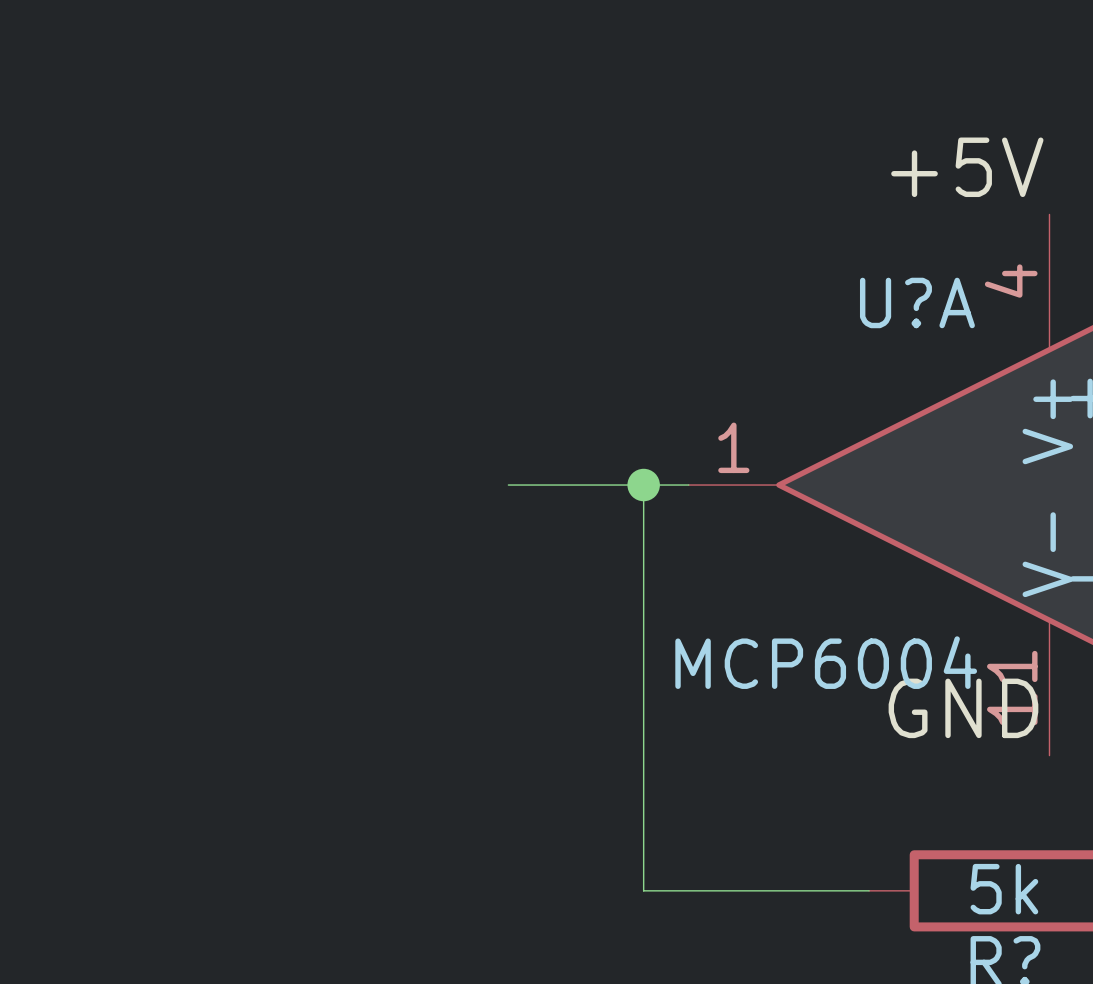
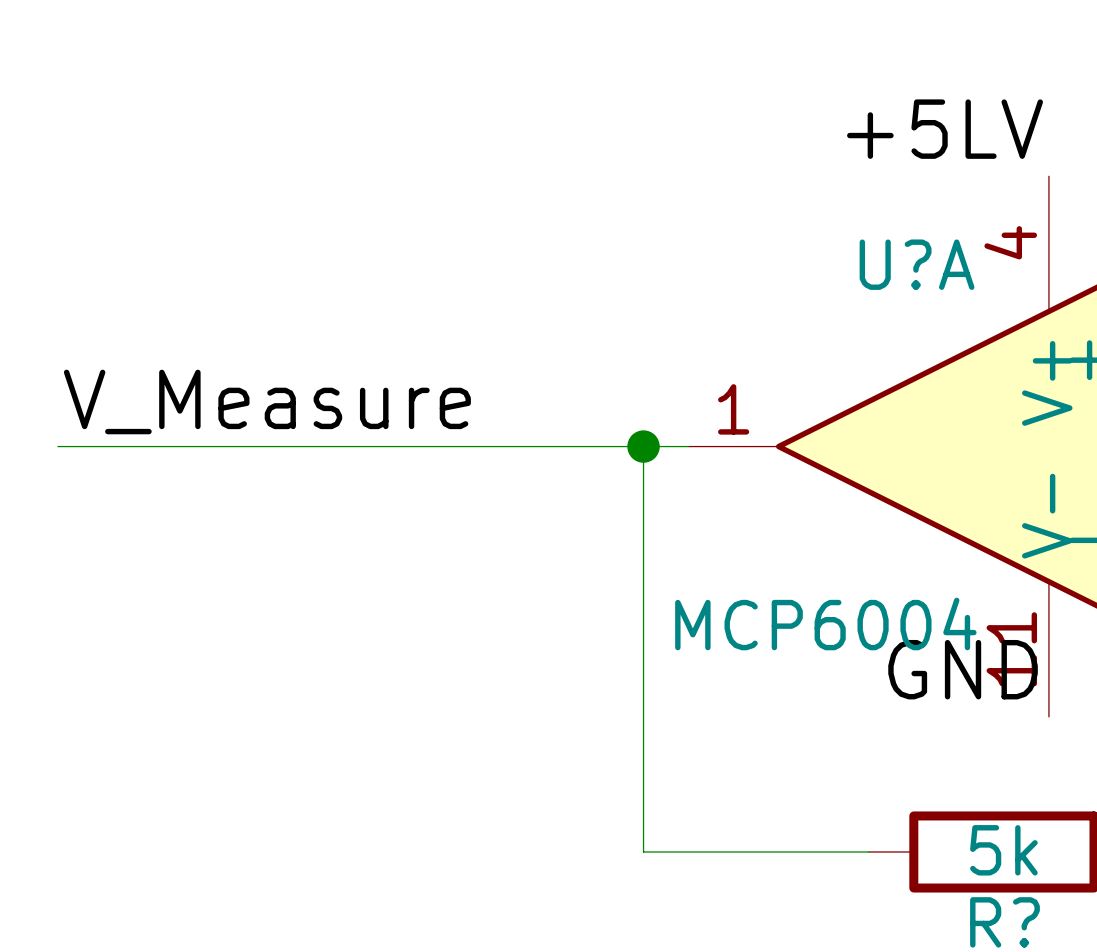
label: +5V (967, 167) -> +5LV (945, 129)
label: none -> V_Measure (267, 401)
wire: none -> (57, 446) (508, 446)

